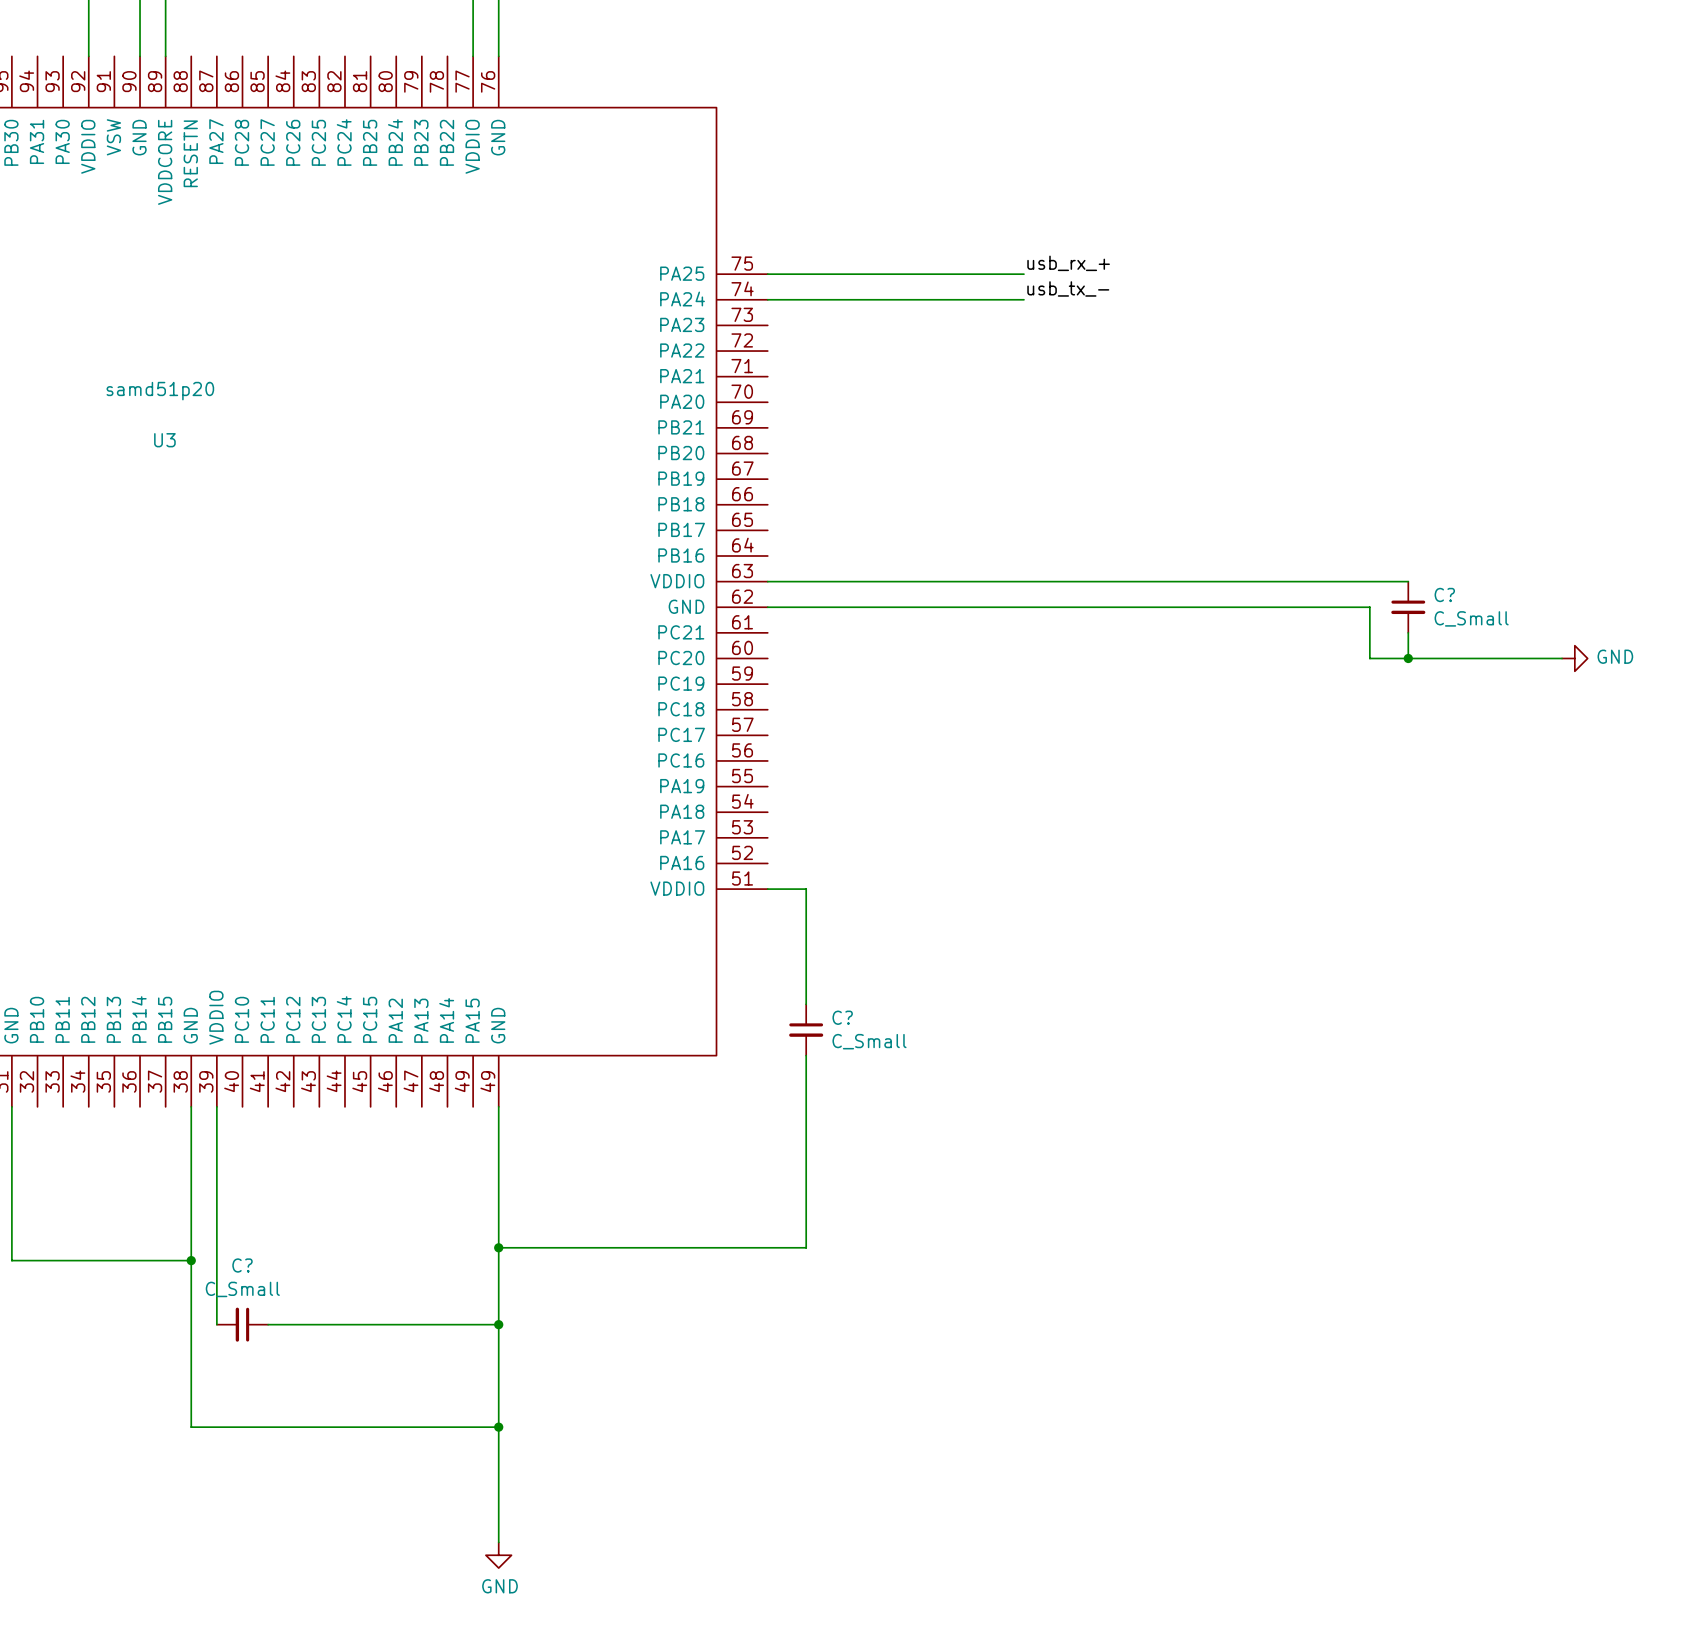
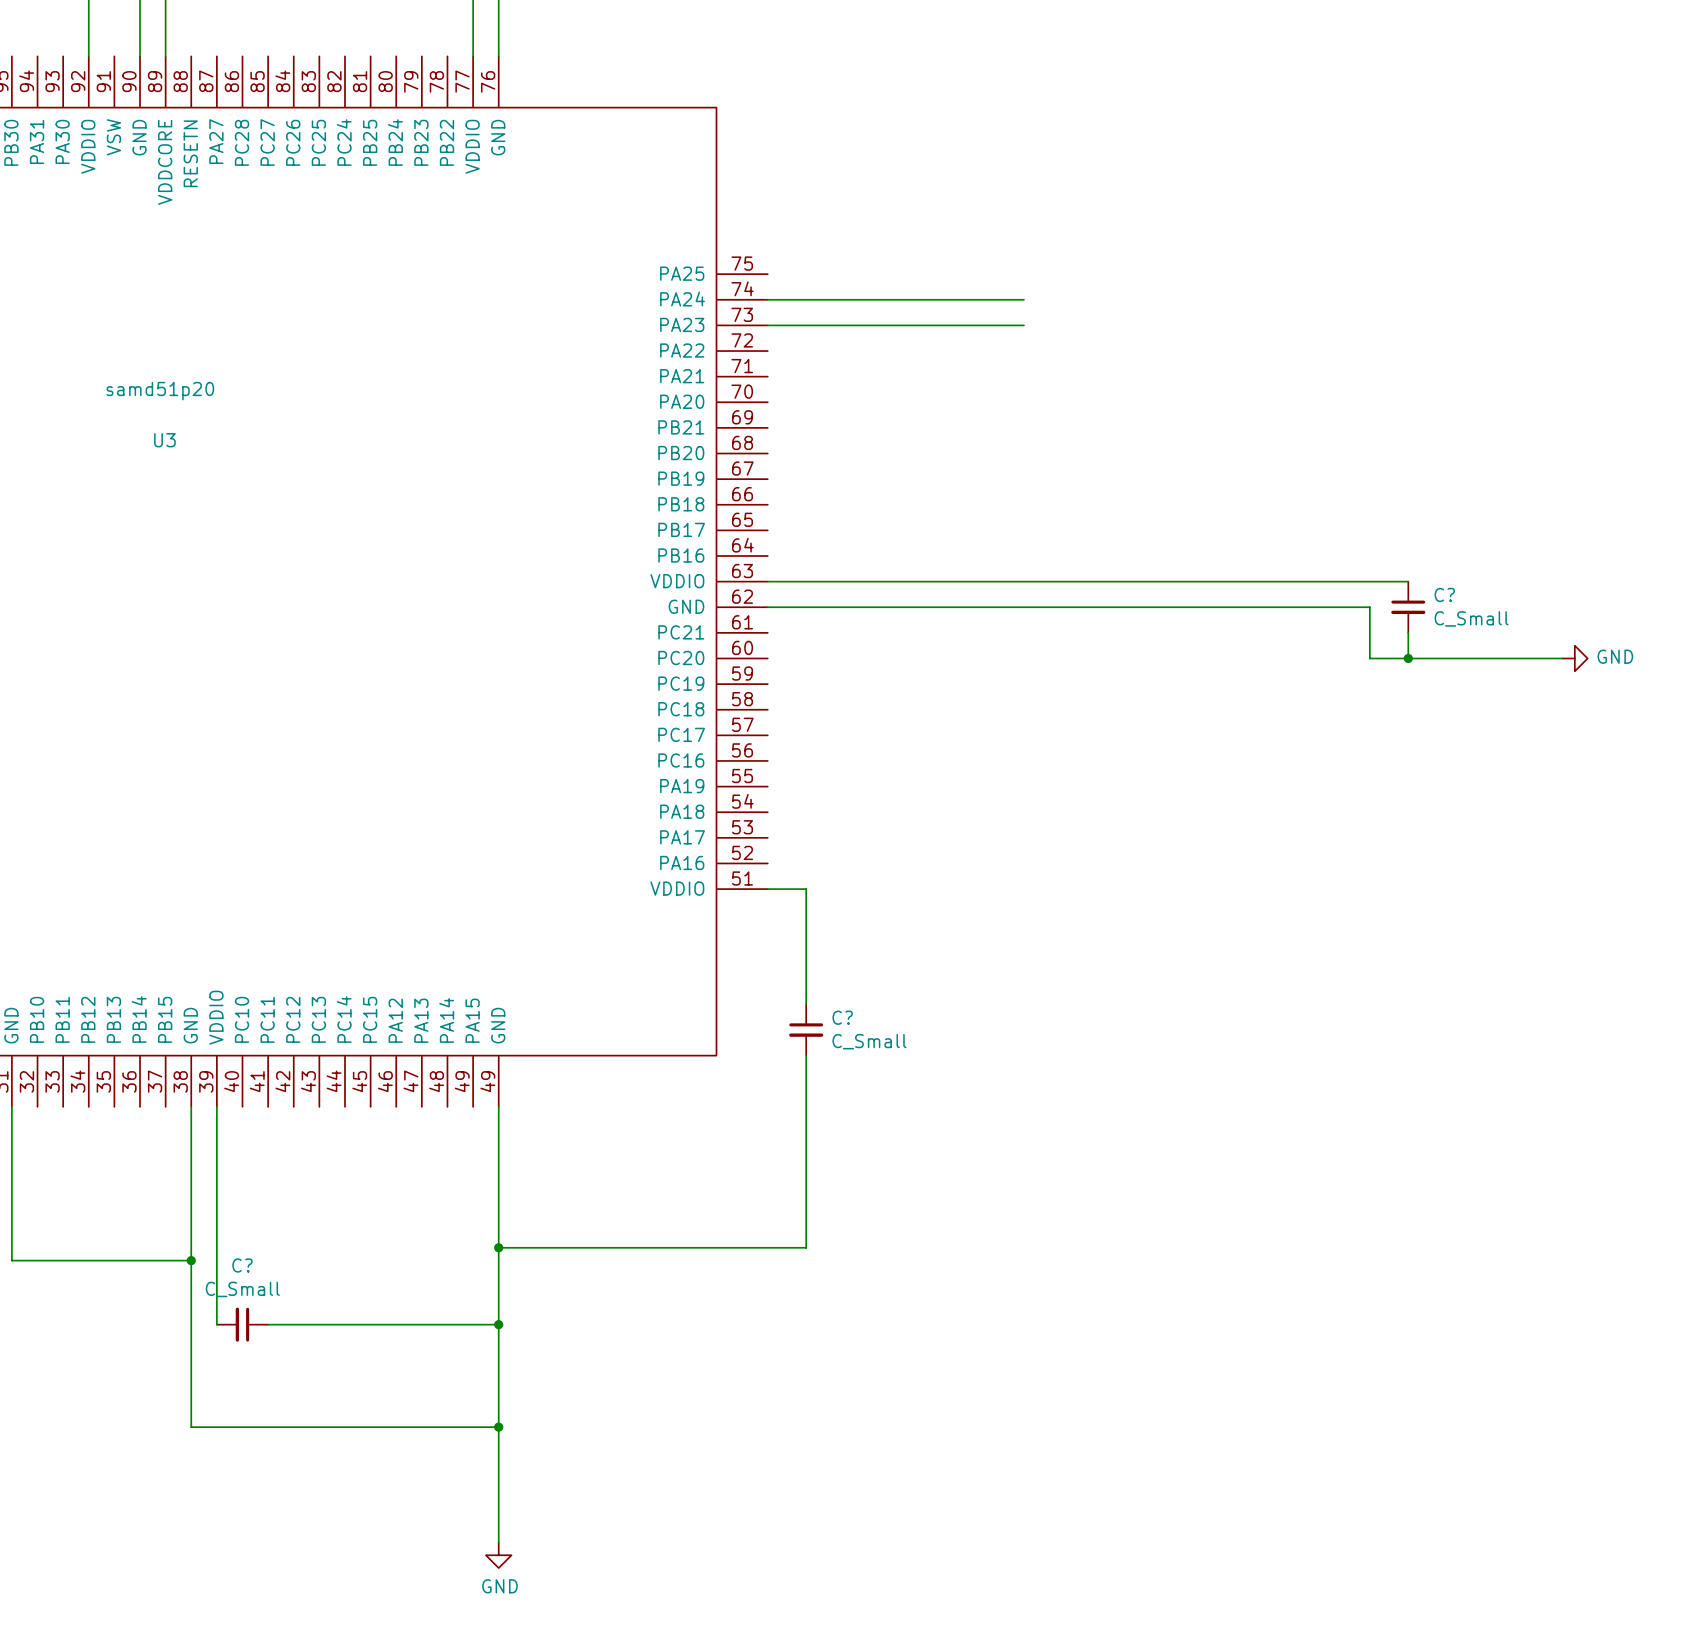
label: usb_rx_+ (1068, 263) -> none
wire: (767, 274) (1023, 274) -> (767, 325) (1023, 325)
label: usb_tx_- (1068, 288) -> none

